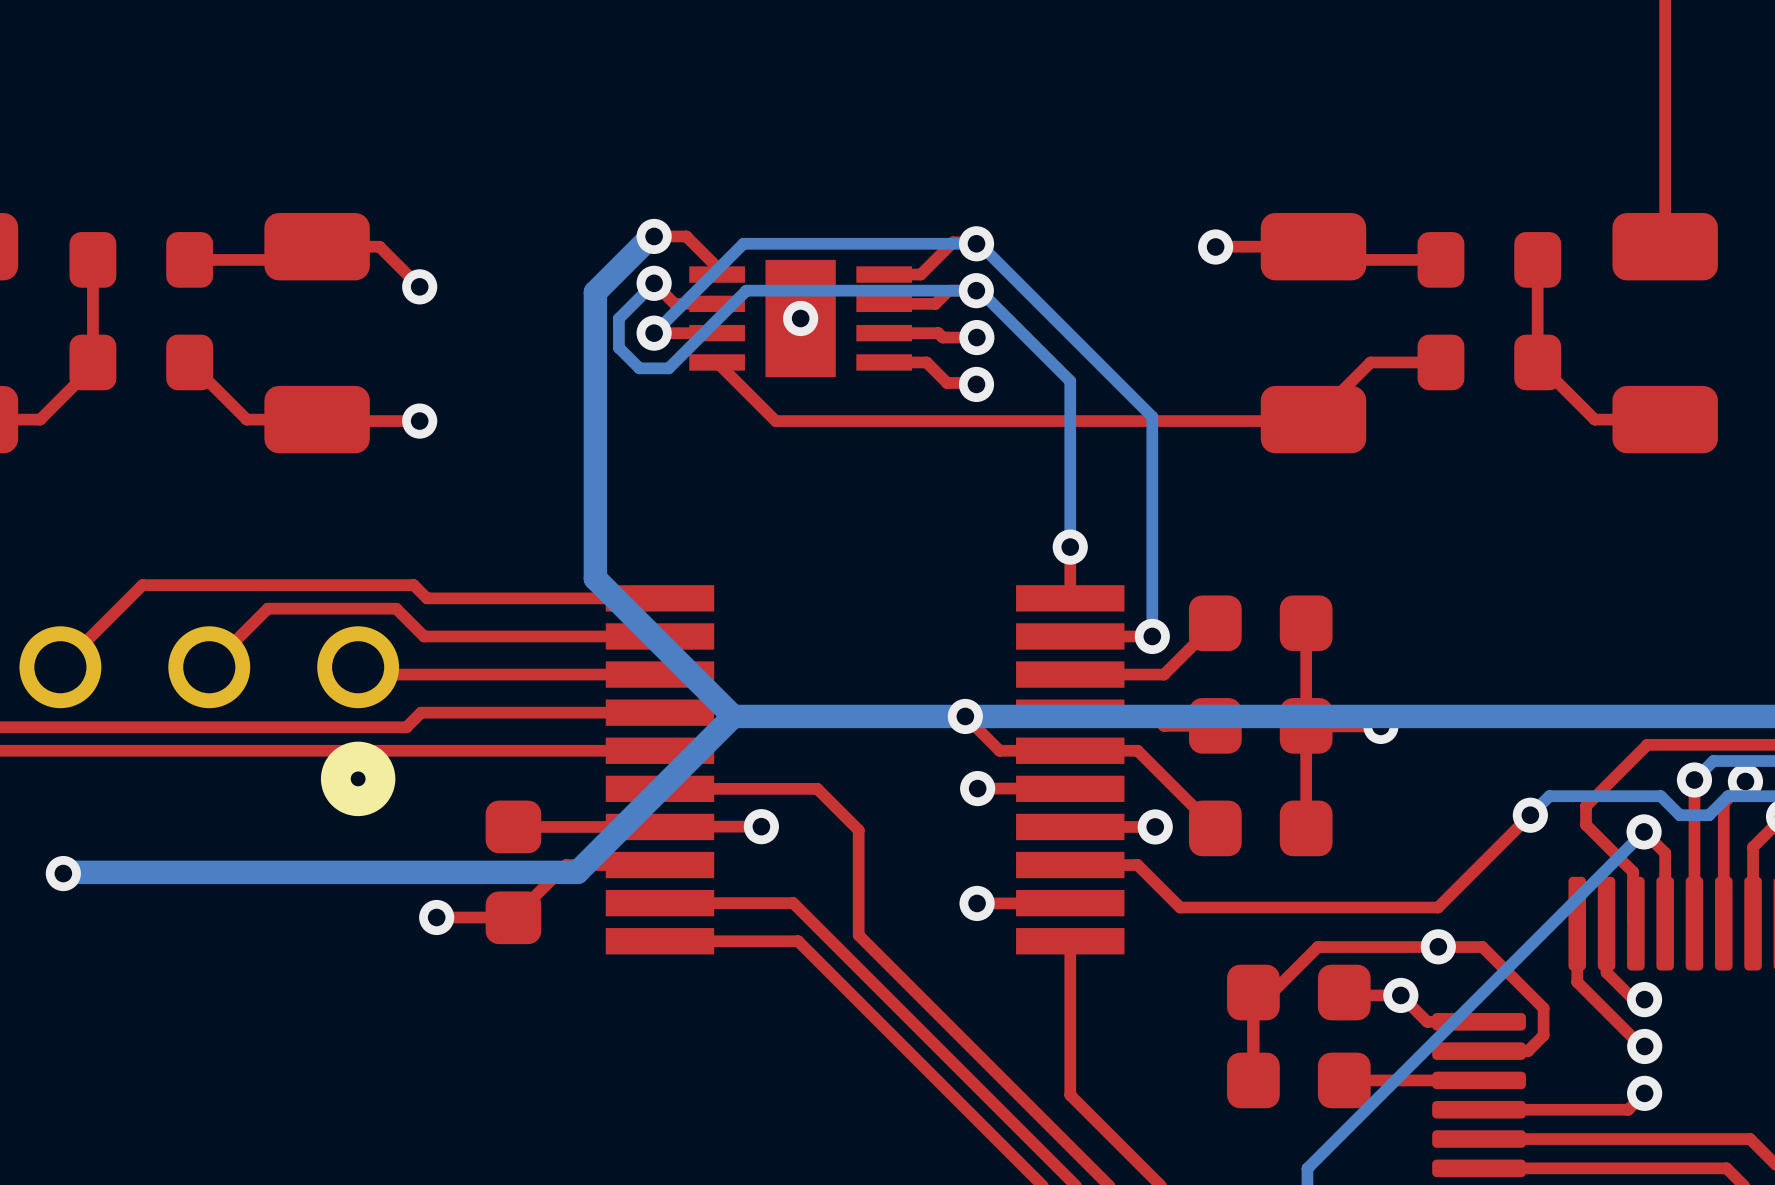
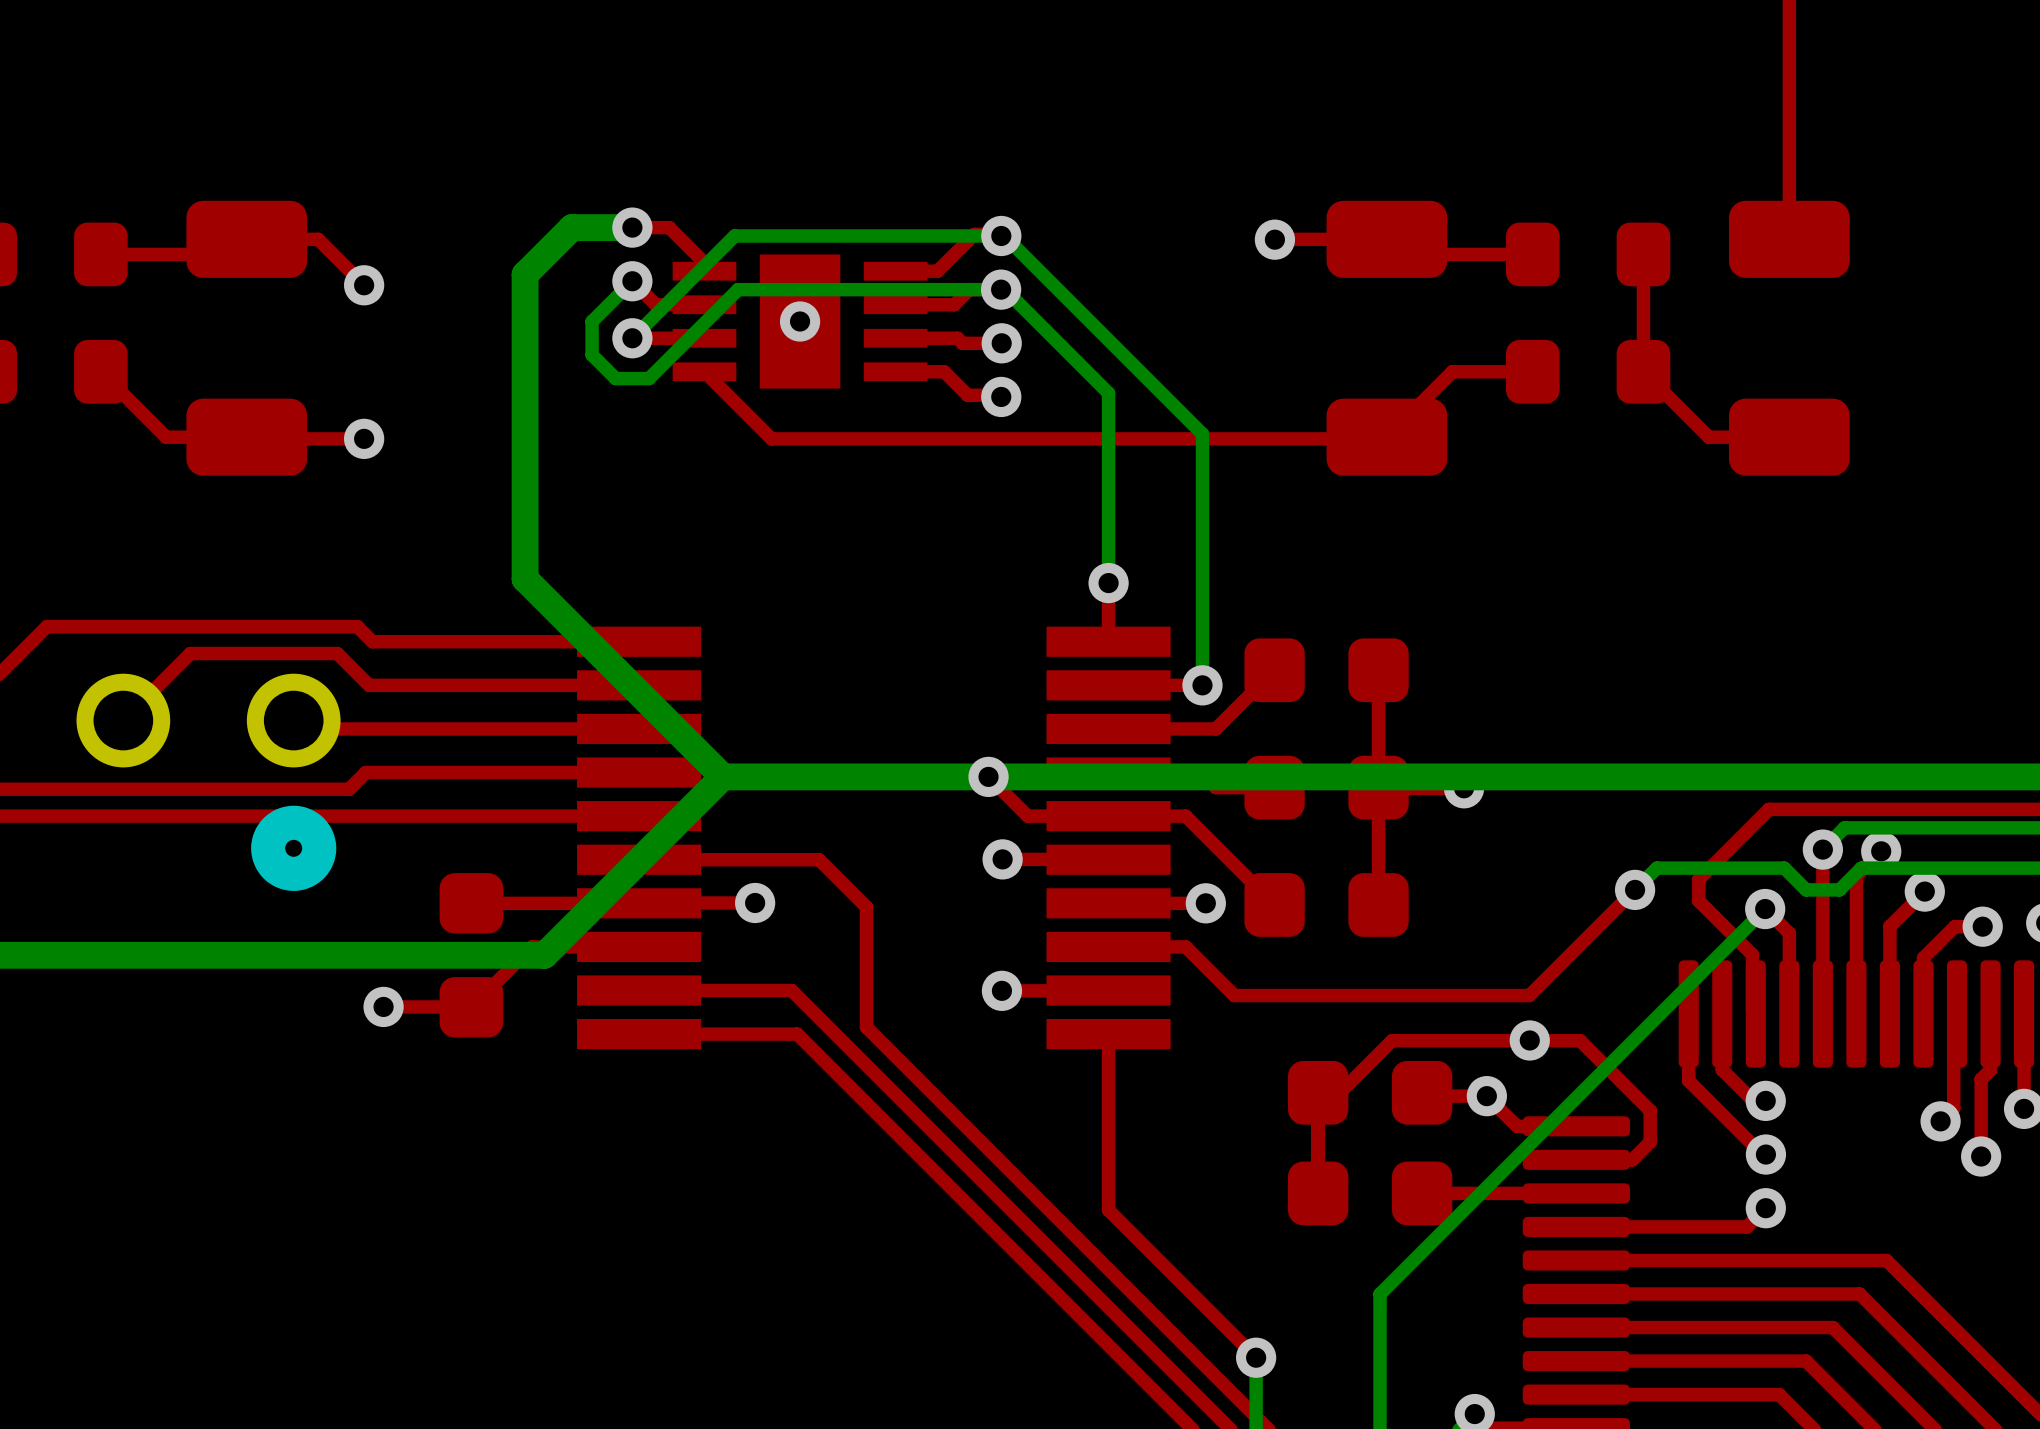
bottom track: (651, 236) (595, 292) (595, 578) -> (629, 227) (572, 227) (525, 274) (525, 579) (565, 619)

